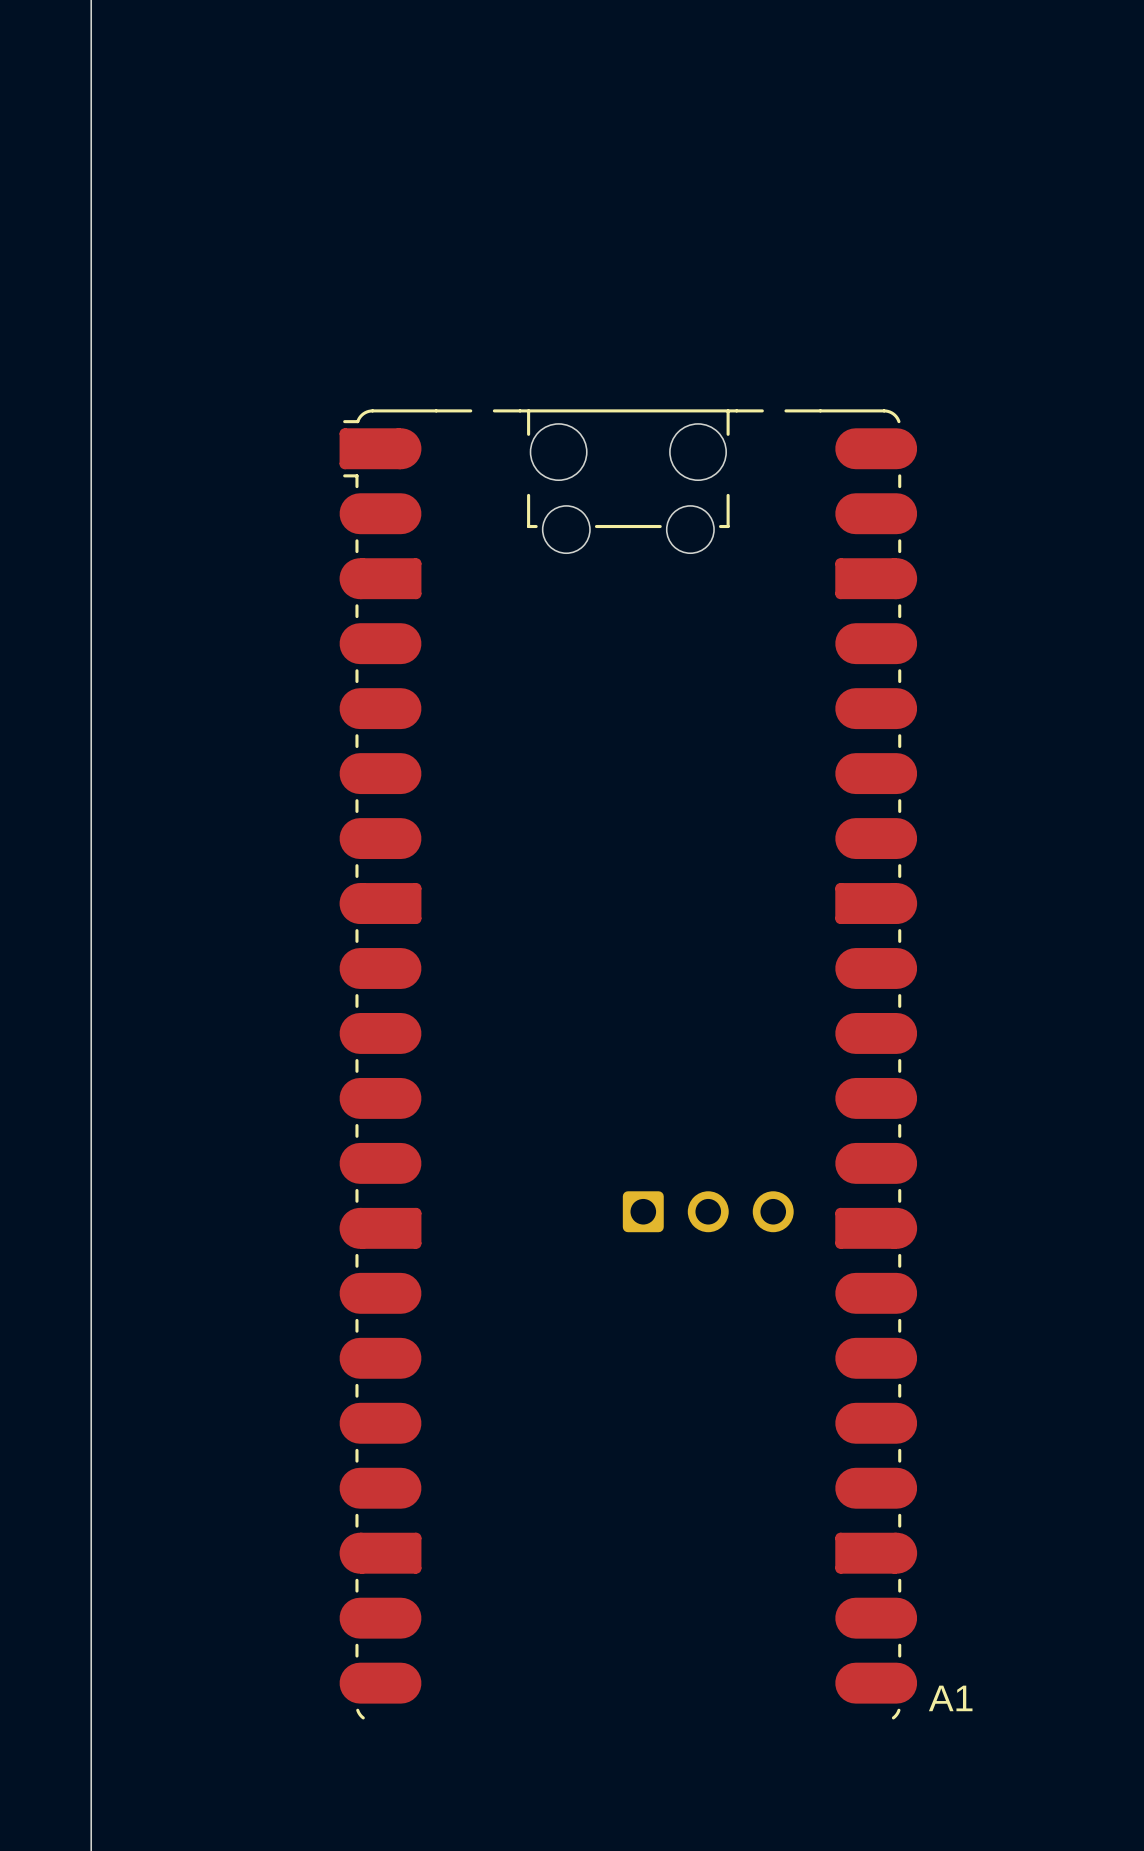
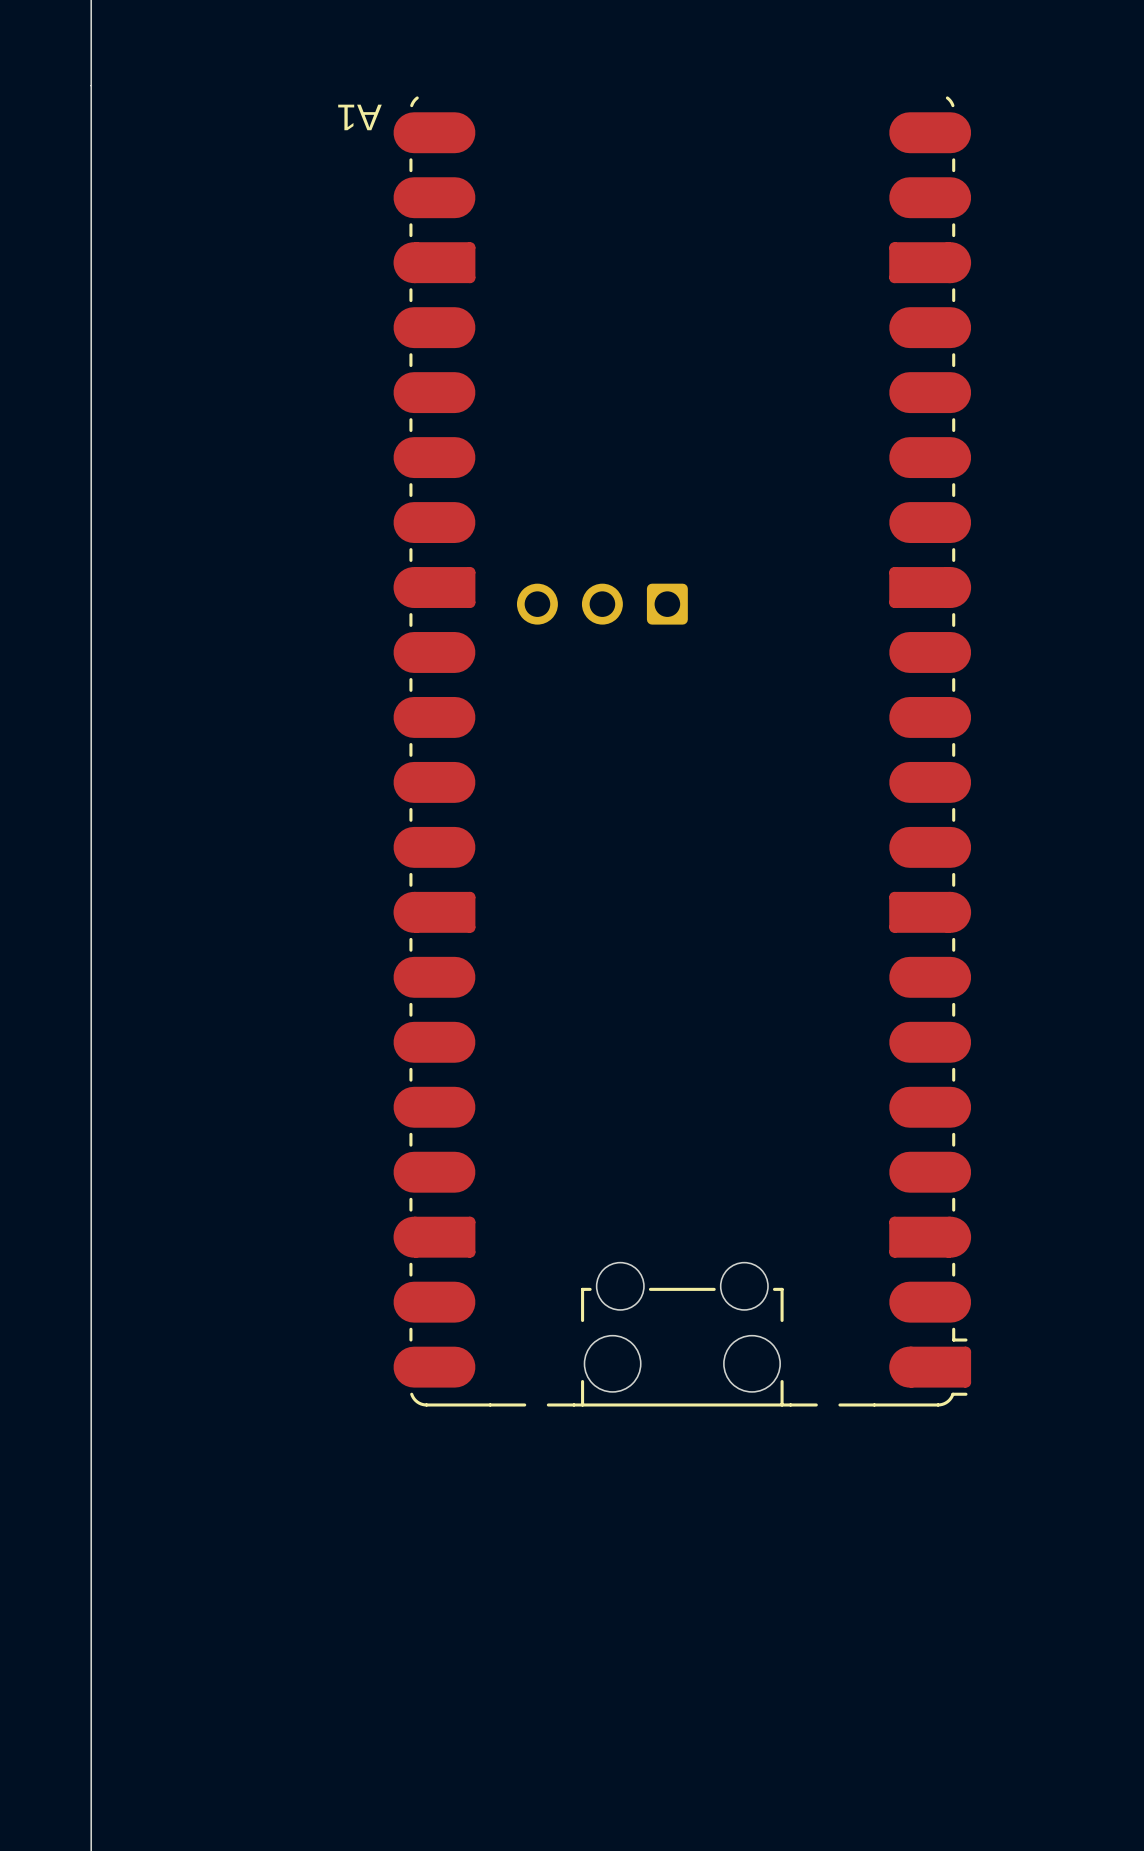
A1 rotation: 0° (628, 1064) -> 180° (682, 751)

